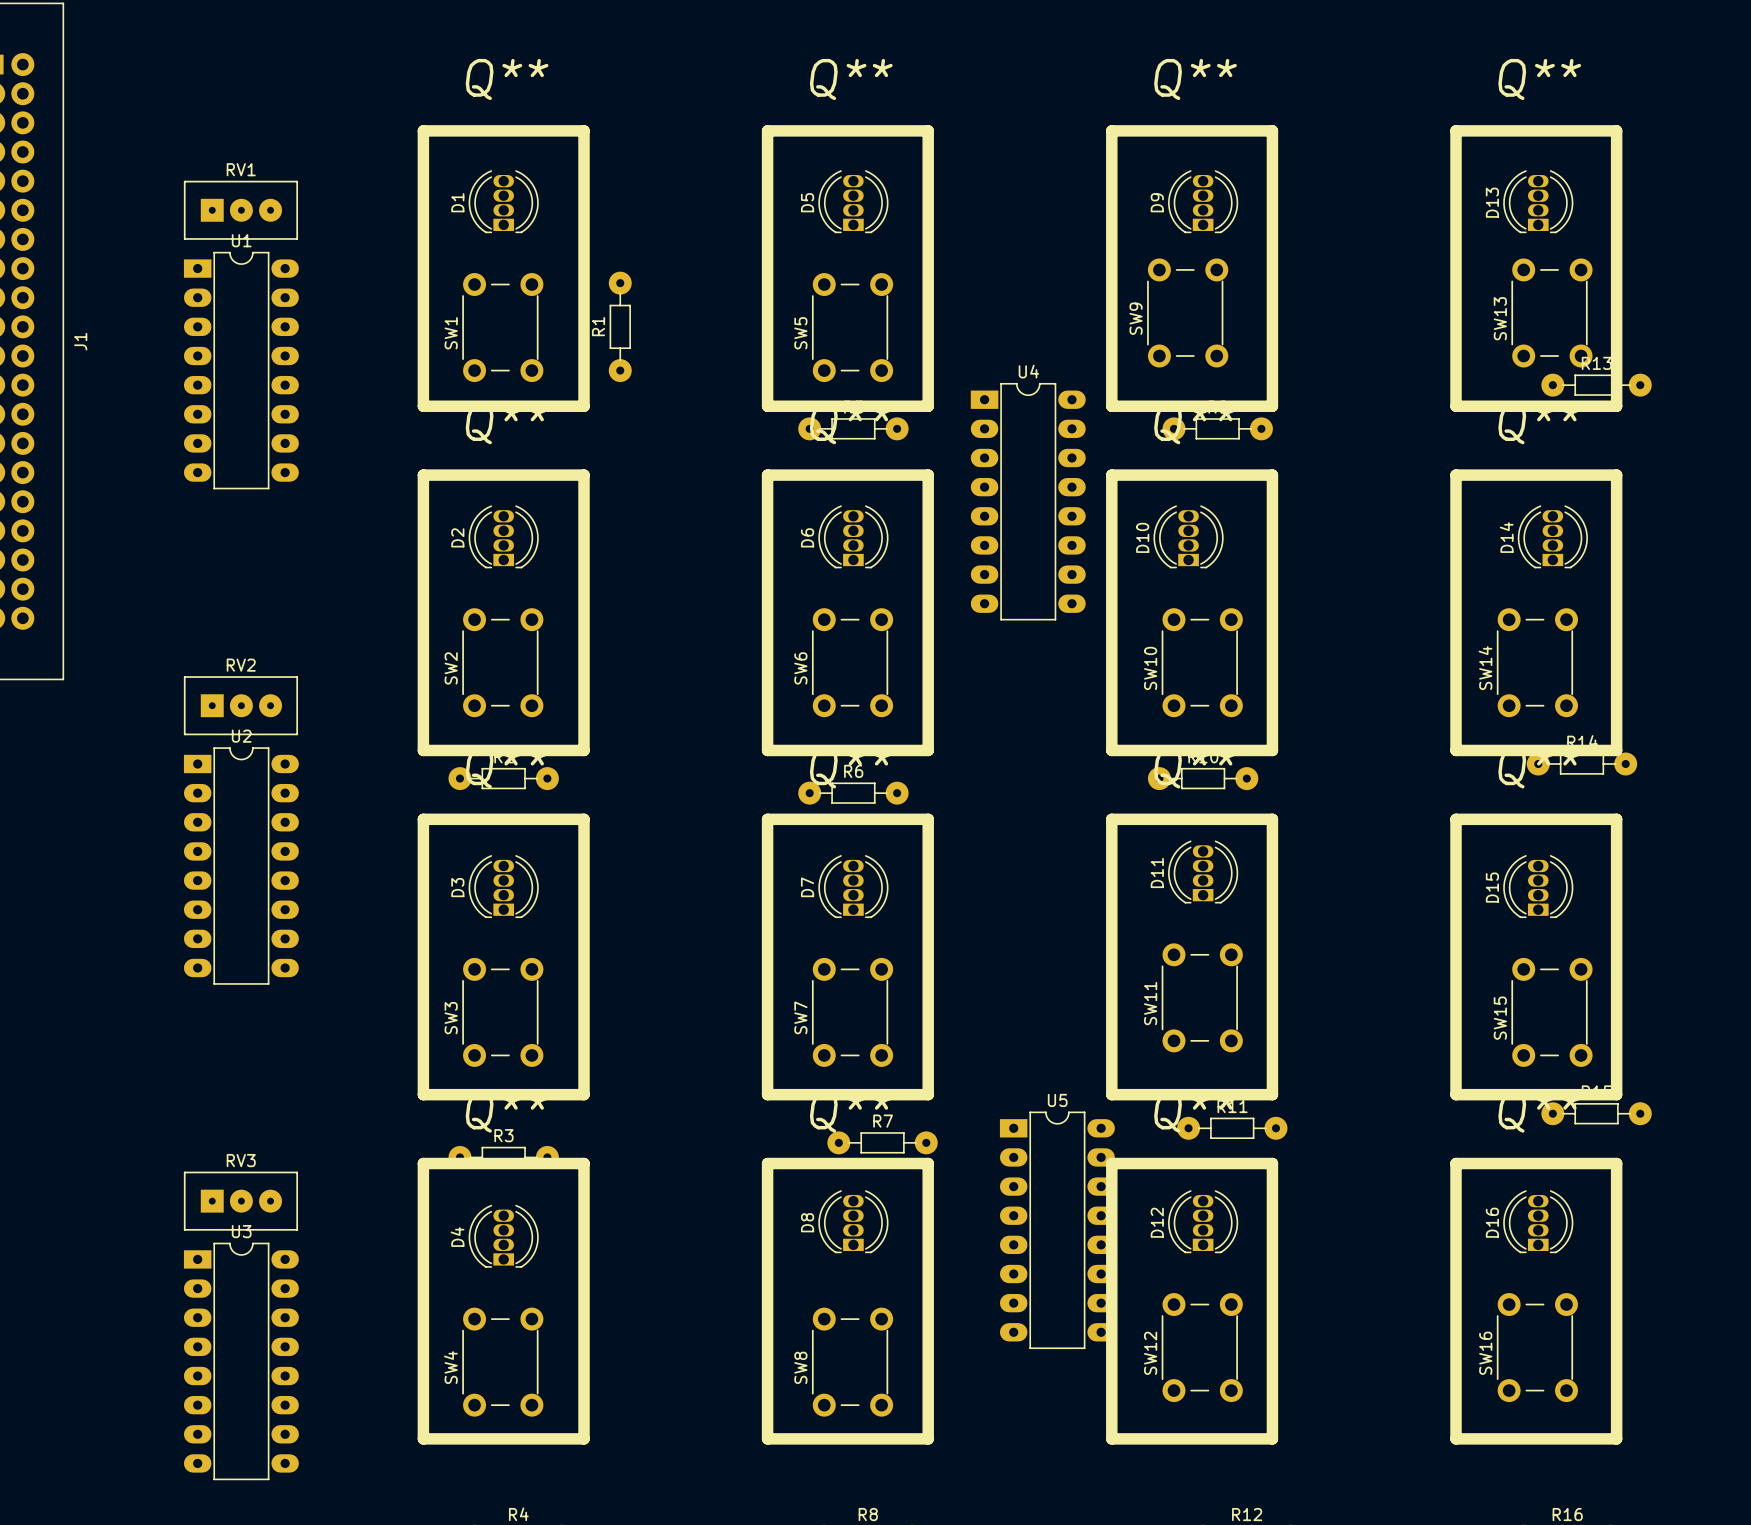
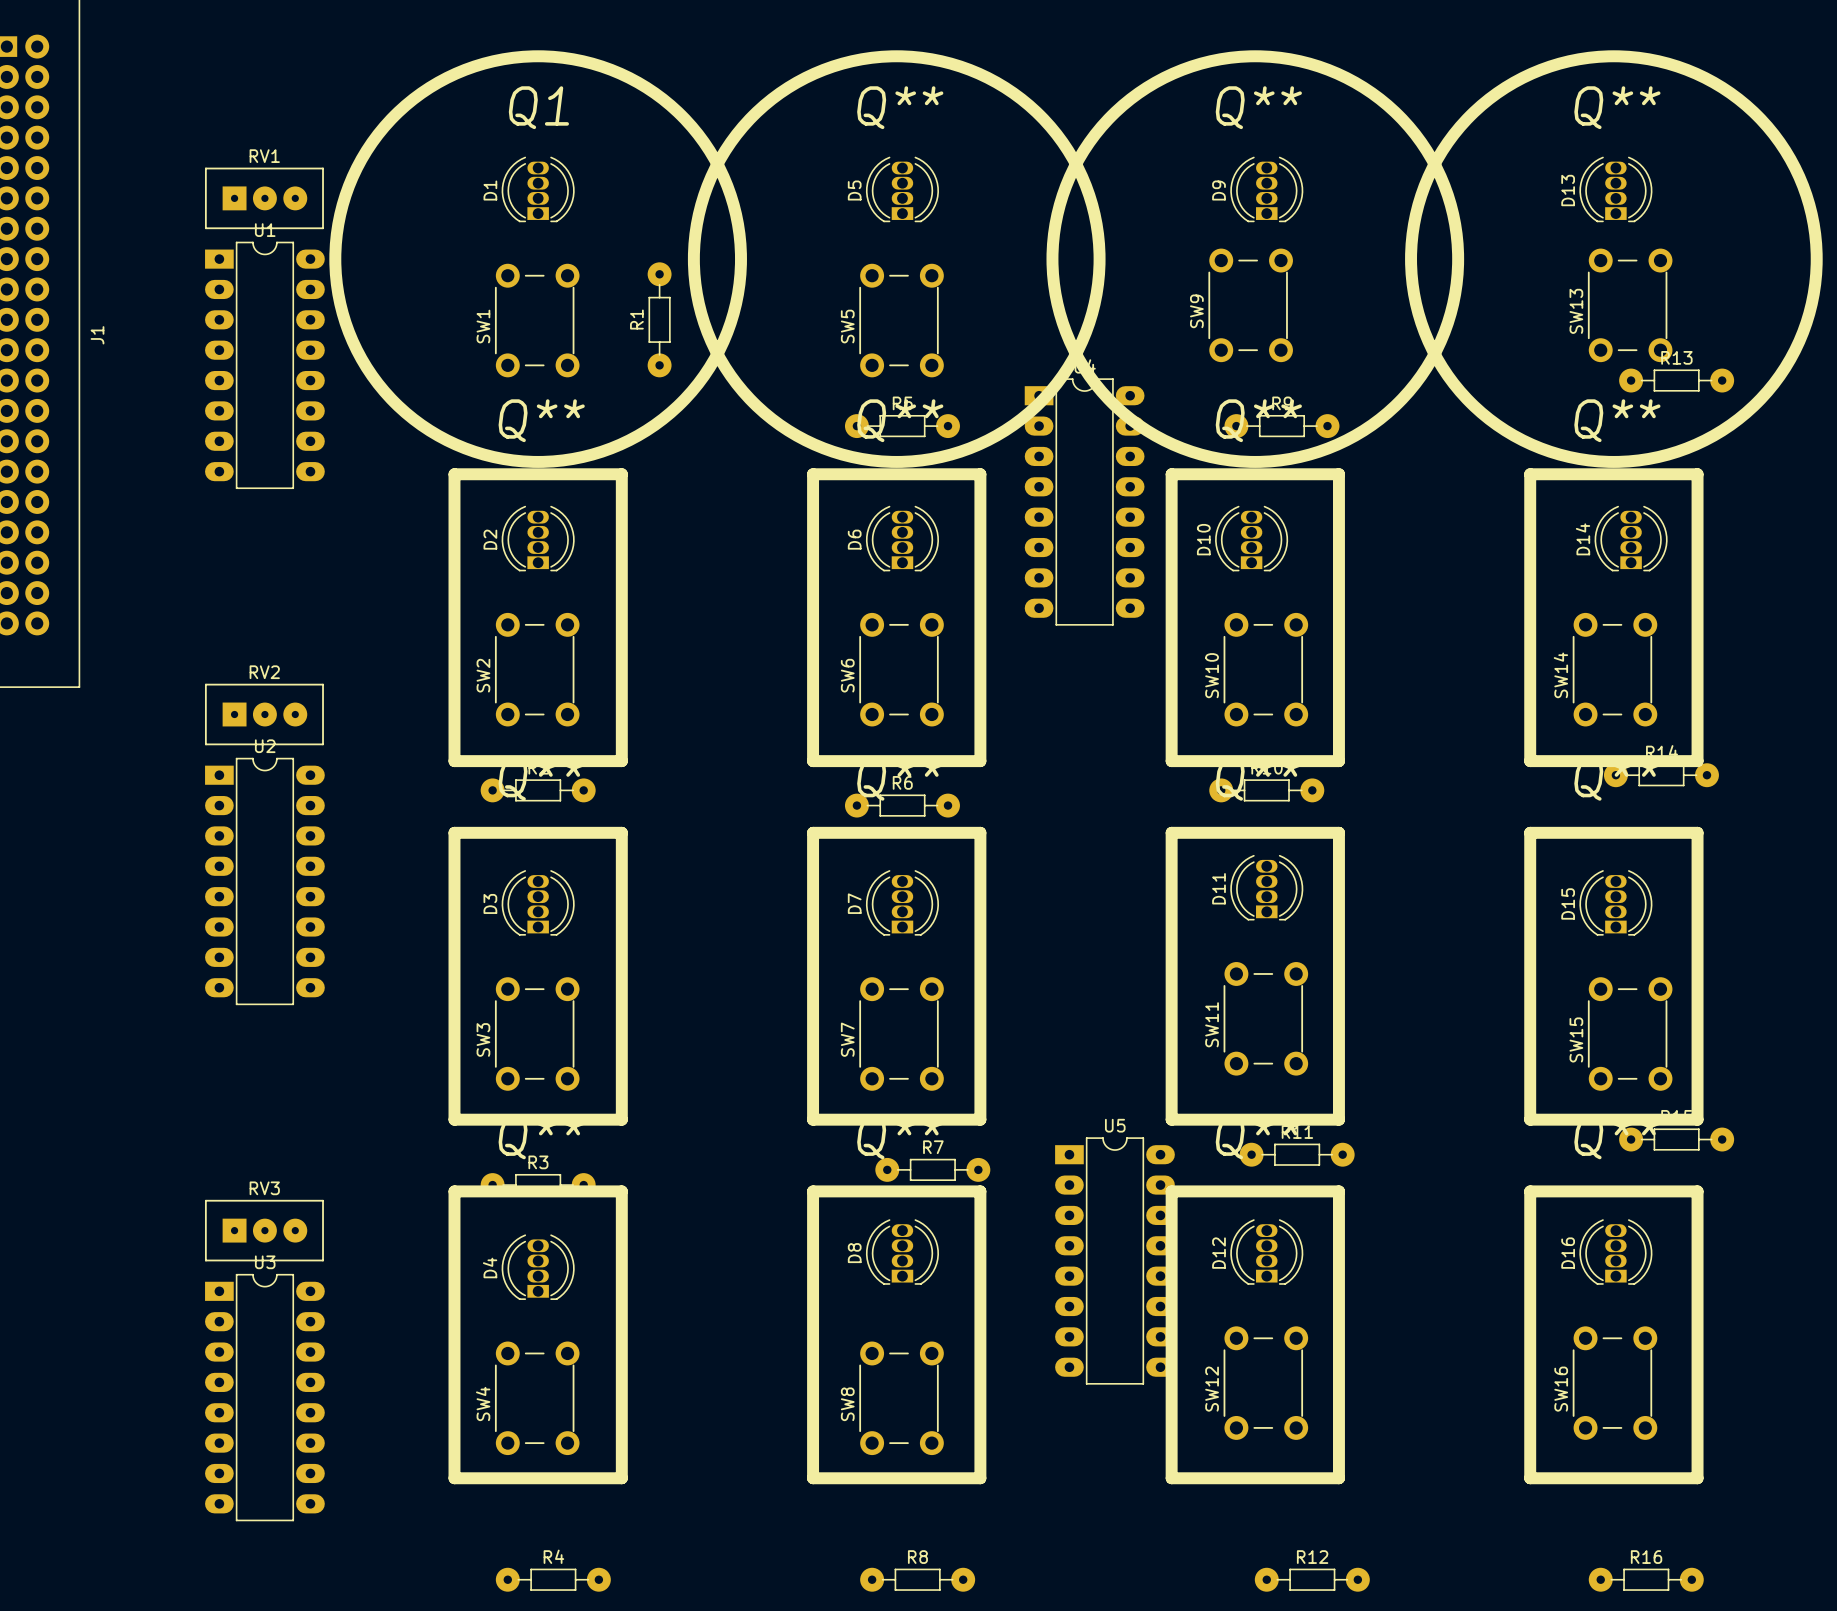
Q** name position: Q** (851, 79) -> Q** (900, 107)
Q** name position: Q** (1195, 79) -> Q** (1258, 107)
Q** name position: Q** (1539, 79) -> Q** (1617, 107)
Q** footprint: [761, 125, 934, 412] -> [687, 50, 1106, 468]
Q** footprint: [1106, 125, 1279, 412] -> [1046, 50, 1465, 468]
Q** footprint: [1450, 125, 1623, 412] -> [1405, 50, 1823, 468]
Q**: (503, 268) -> none
Q1: none -> (538, 259)

